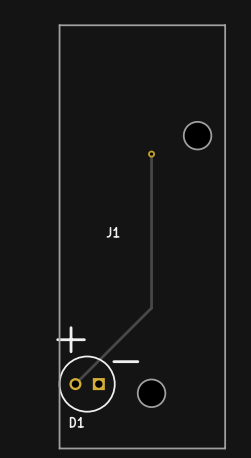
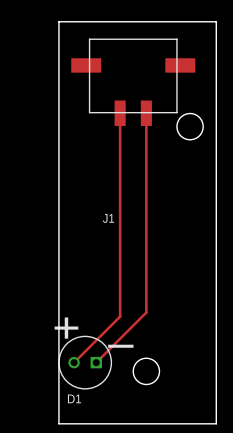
part: none -> (133, 82)
track: none -> (120, 113) (120, 316)
track: none -> (146, 113) (146, 144)
via: (151, 154) -> none
track: (151, 308) (123, 335) -> (146, 290) (146, 312) (96, 362)

